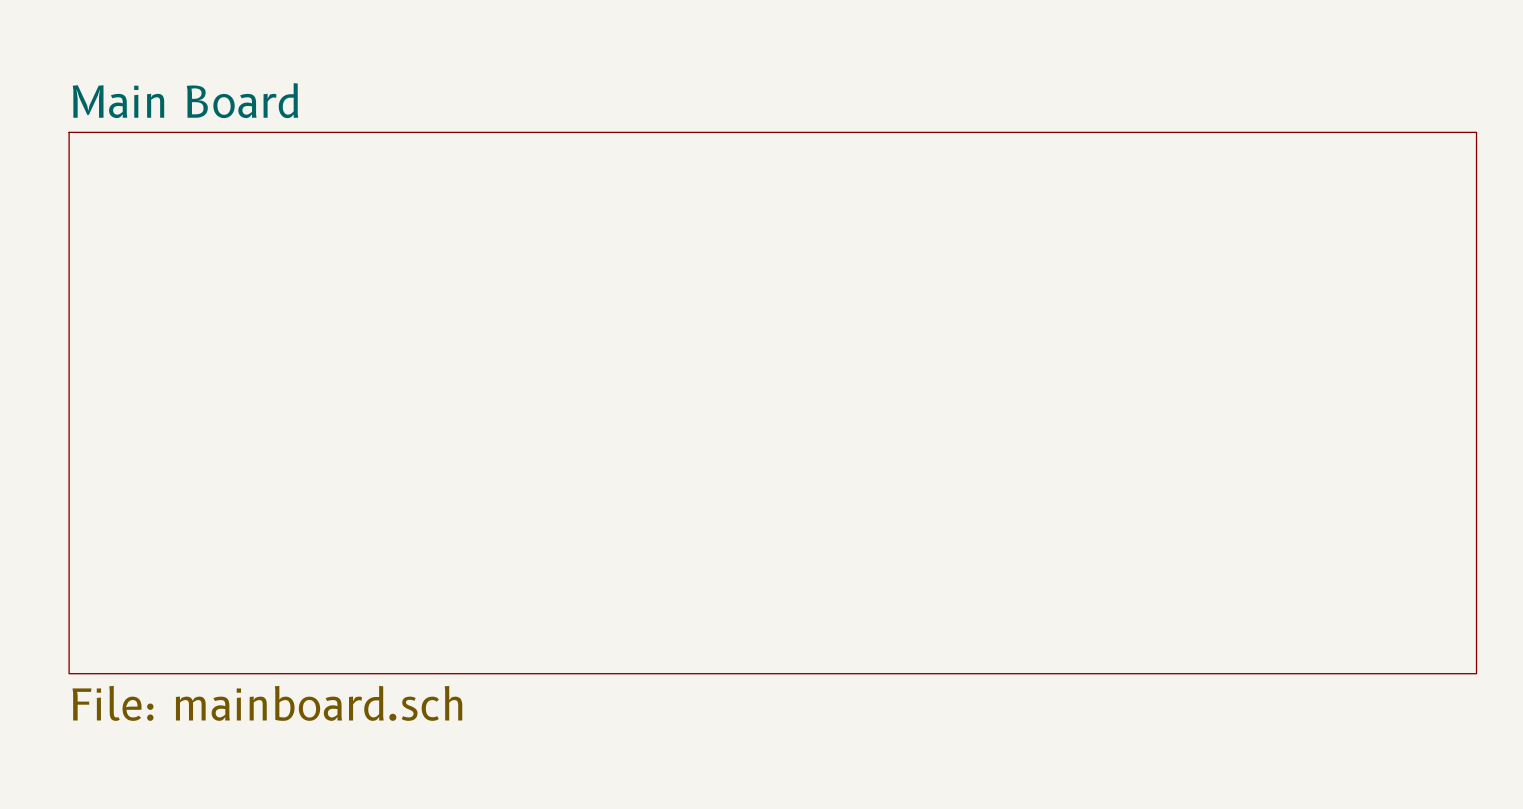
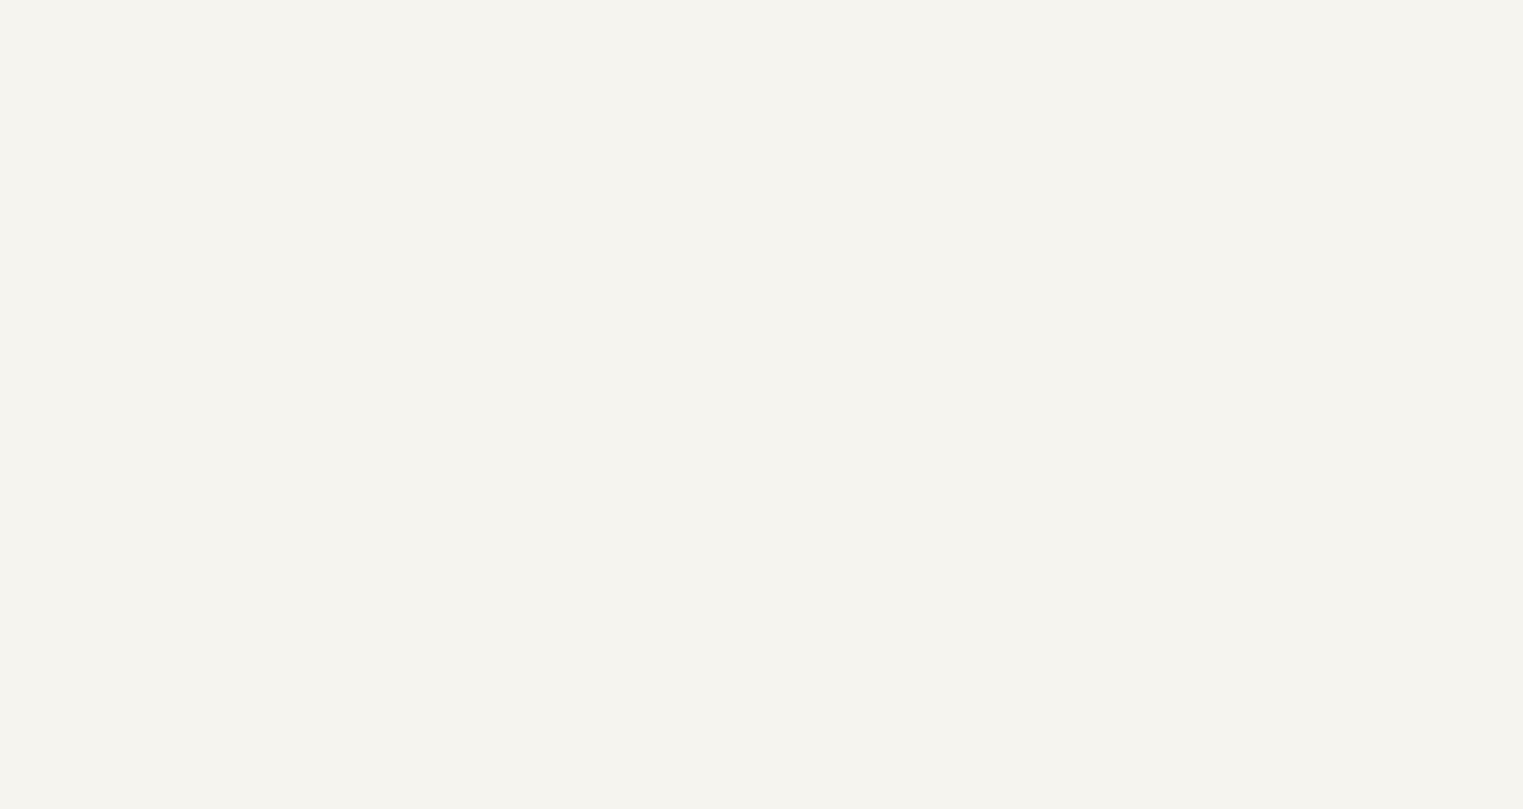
sheet Main Board: File: mainboard.sch (772, 403) -> none

